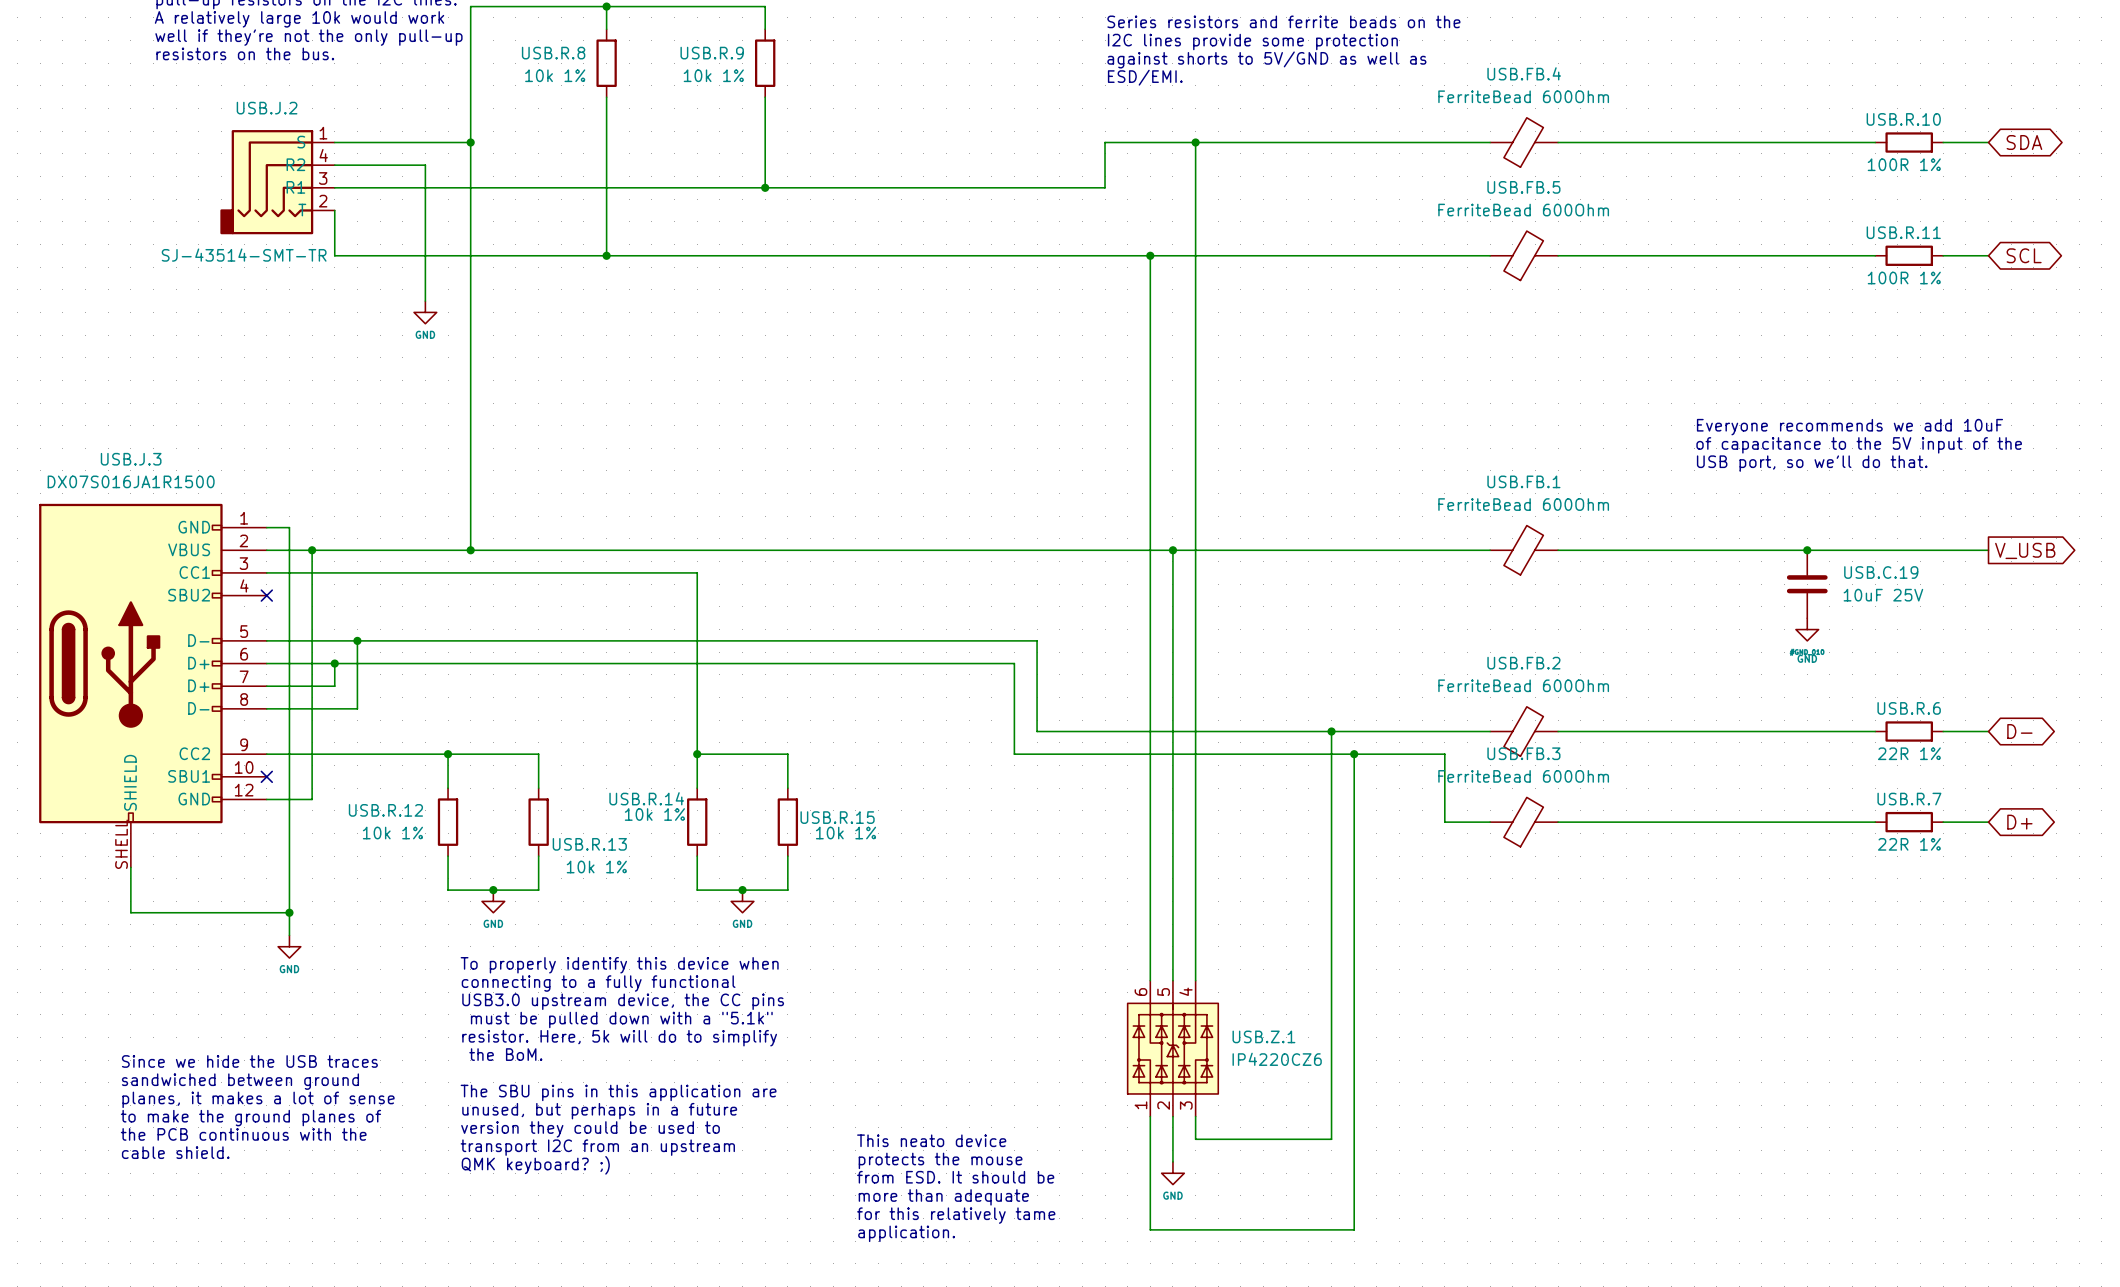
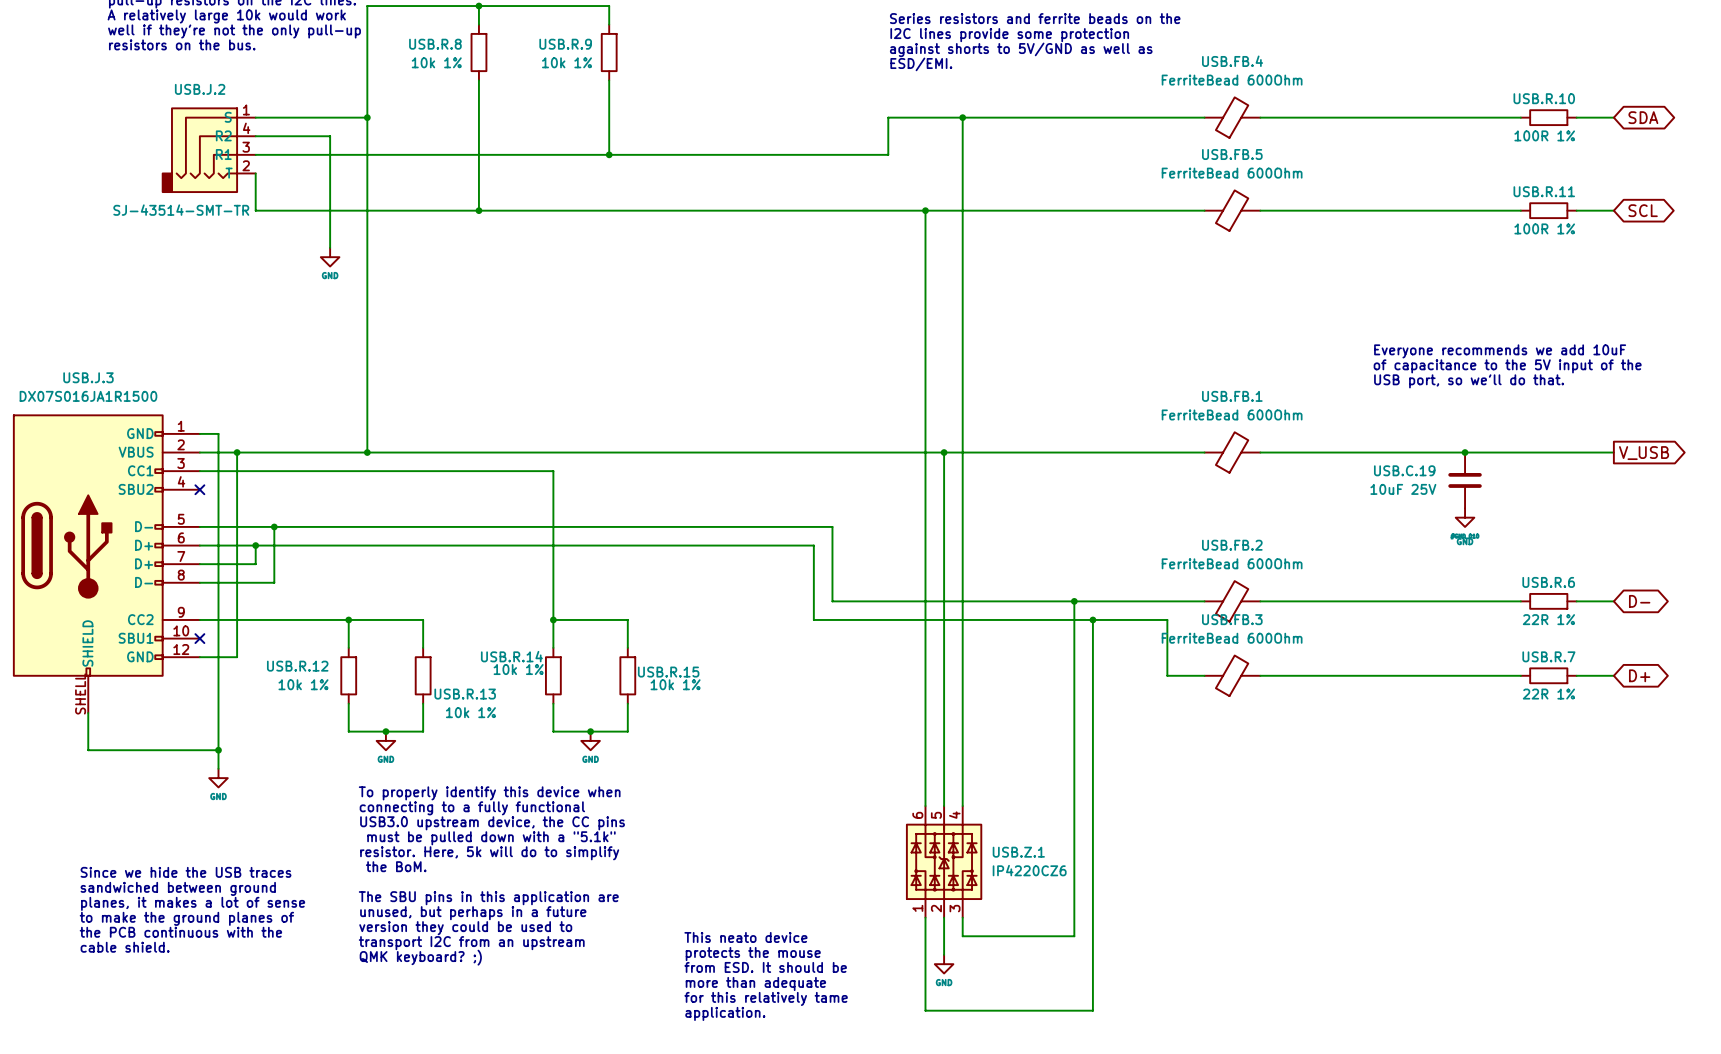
USB.C.19 name position: USB.C.19 (1881, 572) -> USB.C.19 (1404, 470)
USB.C.19 value position: 10uF 25V (1883, 595) -> 10uF 25V (1403, 489)

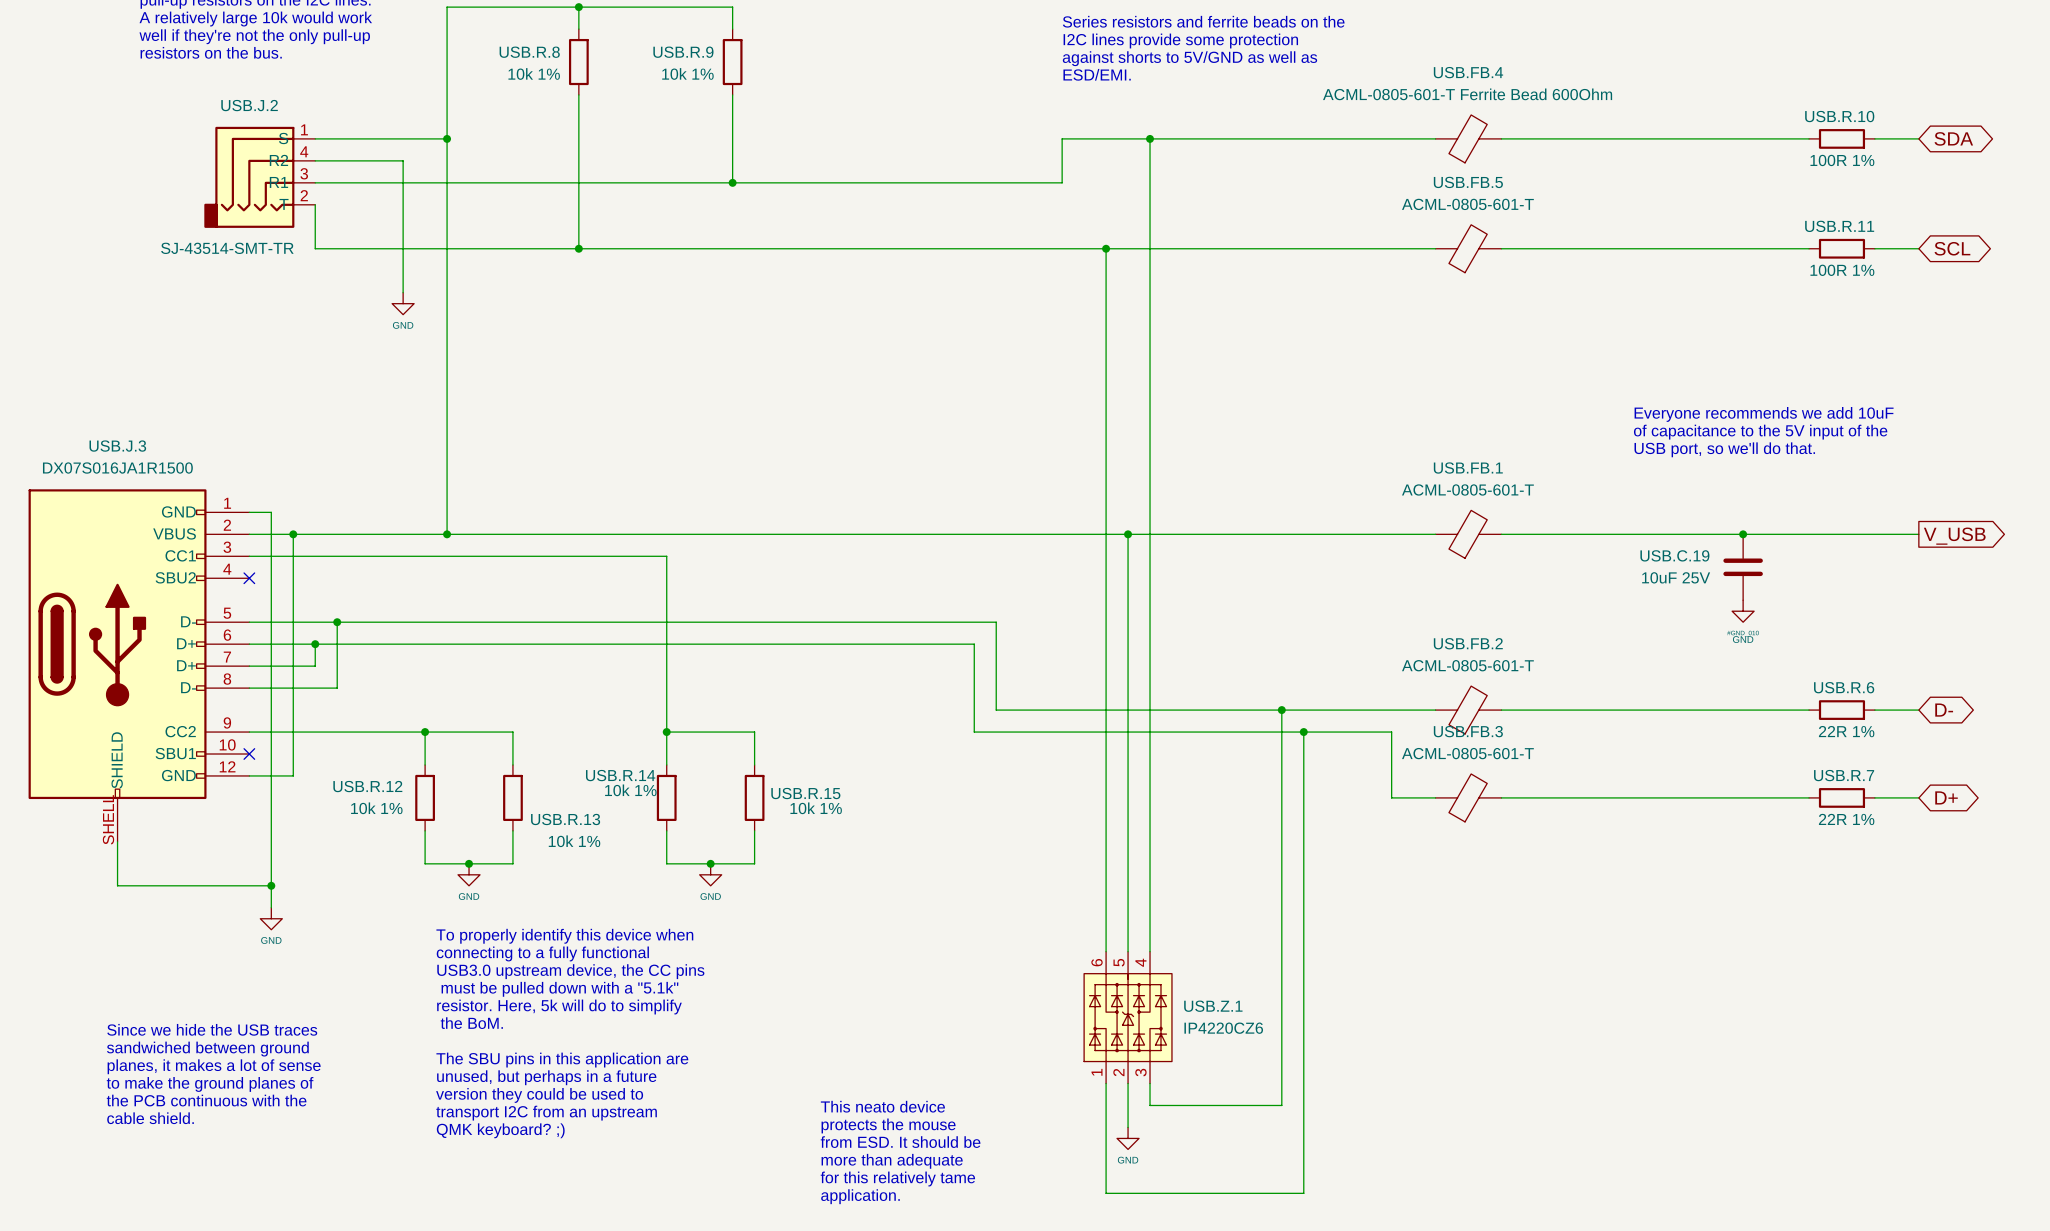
USB.FB.4 value: FerriteBead 600Ohm (1232, 80) -> ACML-0805-601-T Ferrite Bead 600Ohm (1467, 94)
USB.FB.5 value: FerriteBead 600Ohm (1232, 173) -> ACML-0805-601-T (1467, 204)
USB.FB.1 value: FerriteBead 600Ohm (1232, 414) -> ACML-0805-601-T (1467, 489)
USB.FB.2 value: FerriteBead 600Ohm (1232, 563) -> ACML-0805-601-T (1467, 665)
USB.FB.3 value: FerriteBead 600Ohm (1232, 638) -> ACML-0805-601-T (1467, 753)

